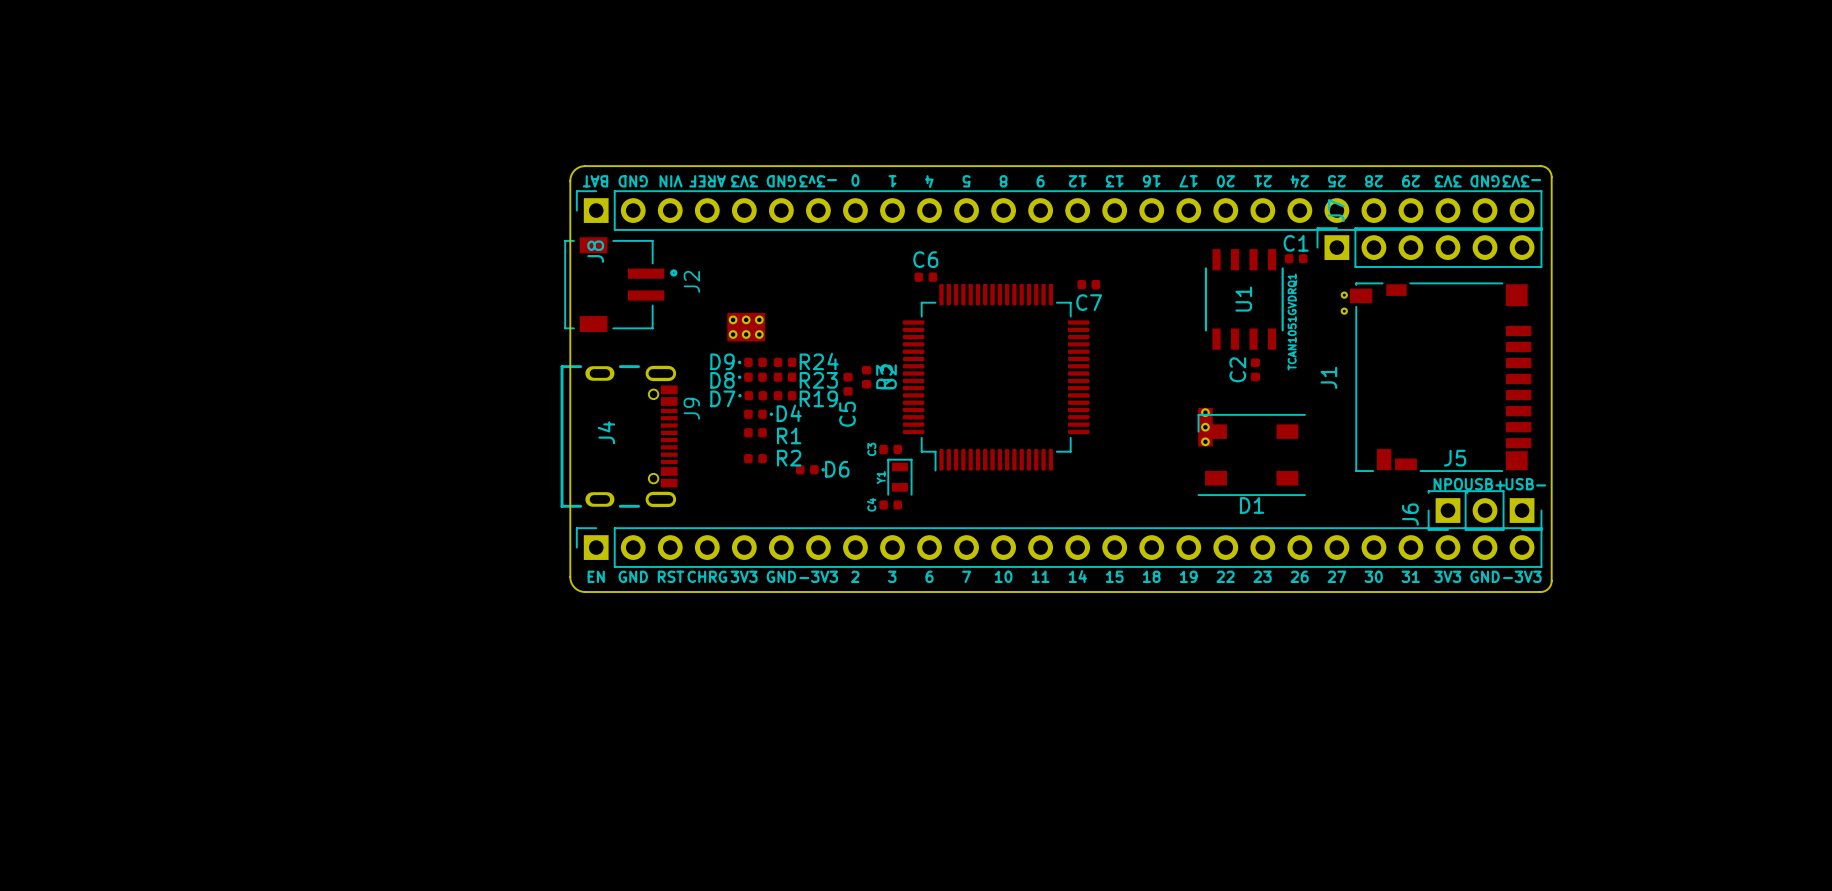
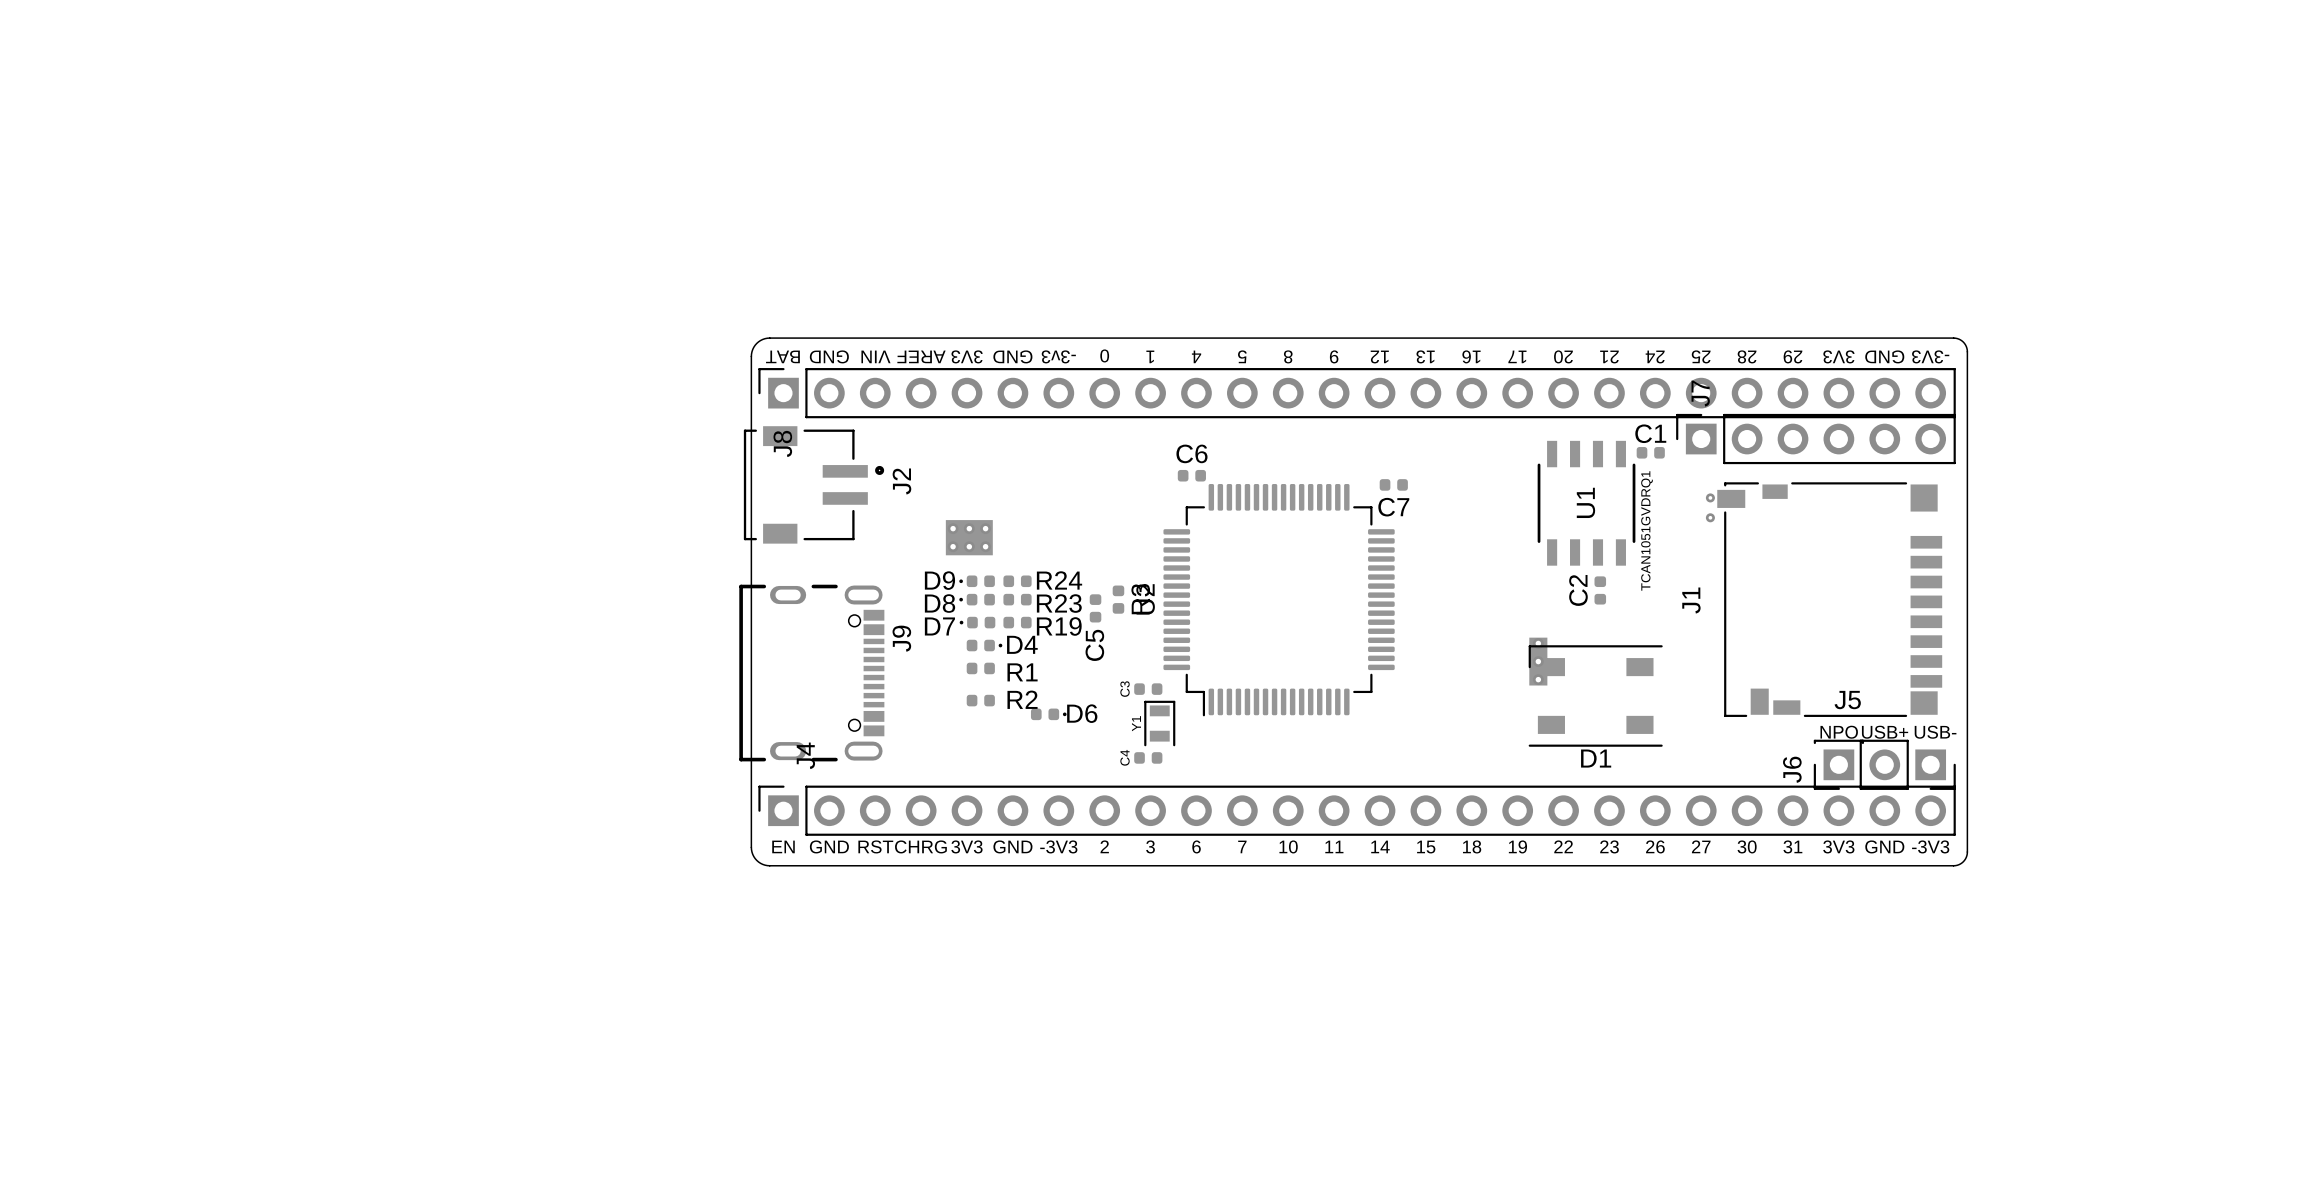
J4 name position: J4 (606, 432) -> J4 (805, 755)

